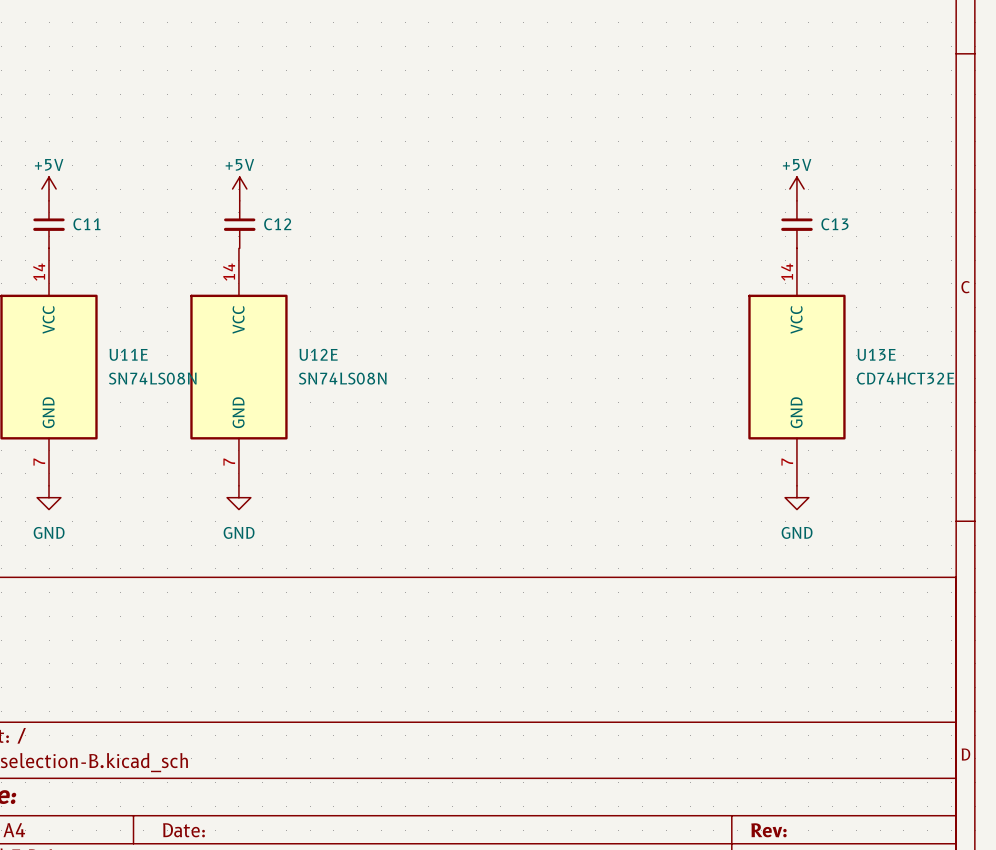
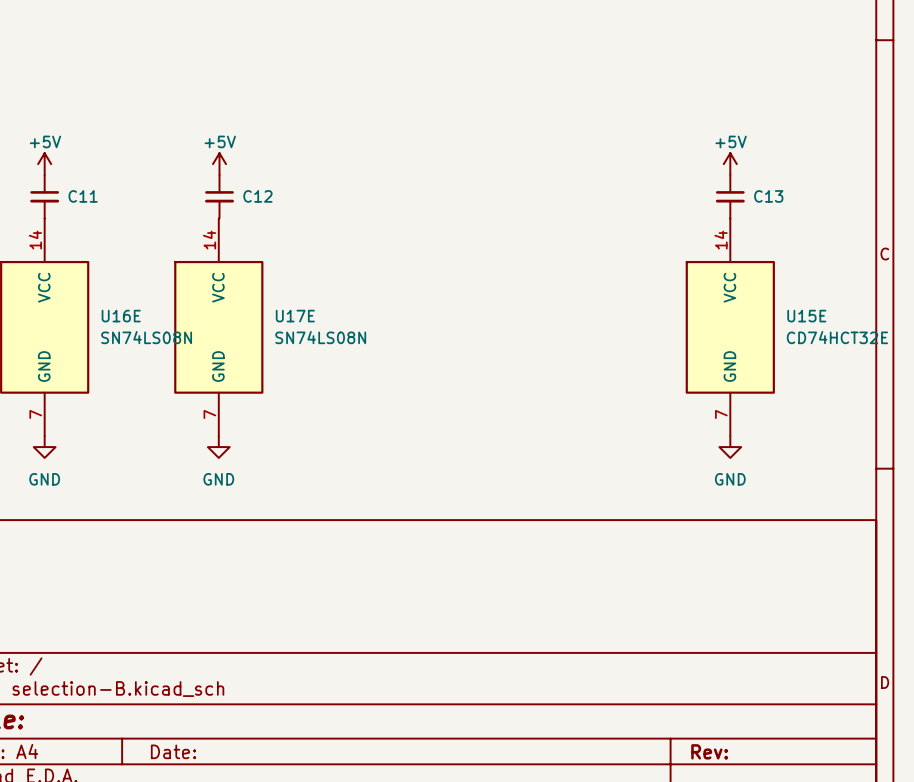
U11E name: U11E (128, 354) -> U16E (121, 316)
U12E name: U12E (318, 354) -> U17E (295, 316)
U13E name: U13E (876, 354) -> U15E (806, 316)

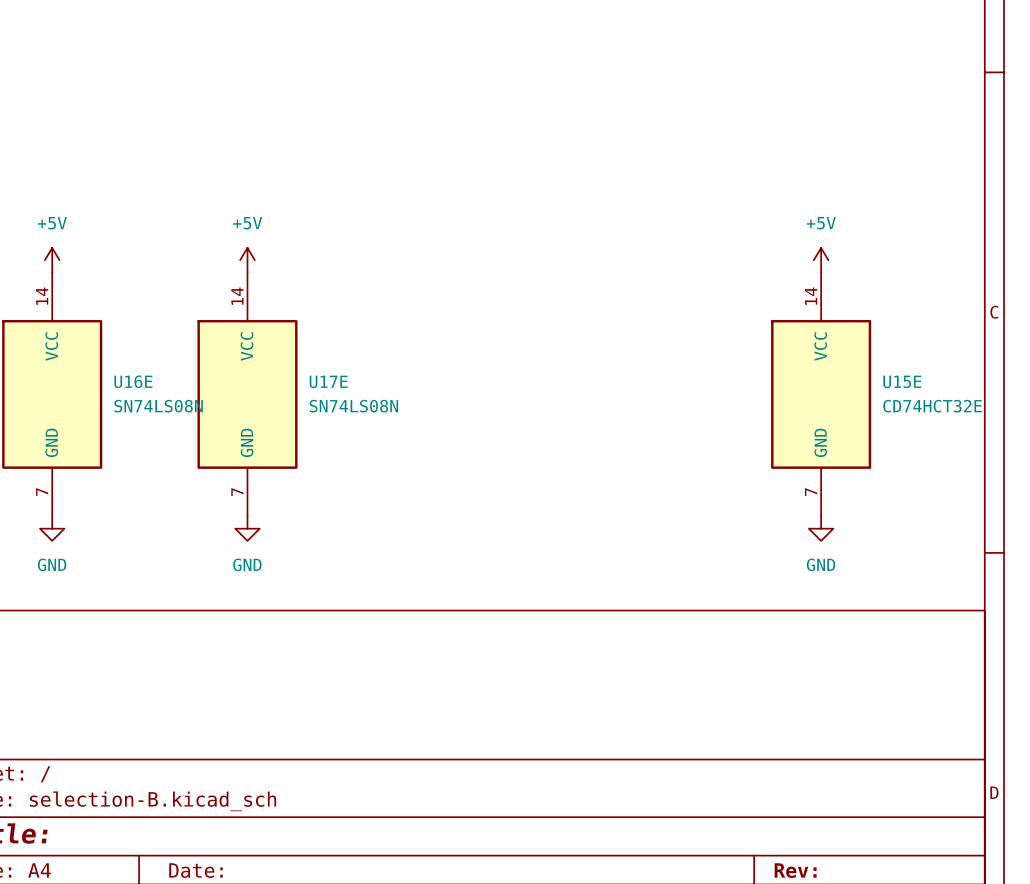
power symbol text position: +5V (45, 141) -> +5V (52, 223)
power symbol text position: +5V (220, 141) -> +5V (247, 223)
power symbol text position: +5V (731, 141) -> +5V (821, 223)
power symbol position: +5V (44, 164) -> +5V (52, 260)
power symbol position: +5V (219, 164) -> +5V (247, 260)
power symbol position: +5V (730, 164) -> +5V (821, 260)
C11: (44, 196) -> none
C12: (219, 196) -> none
C13: (730, 196) -> none

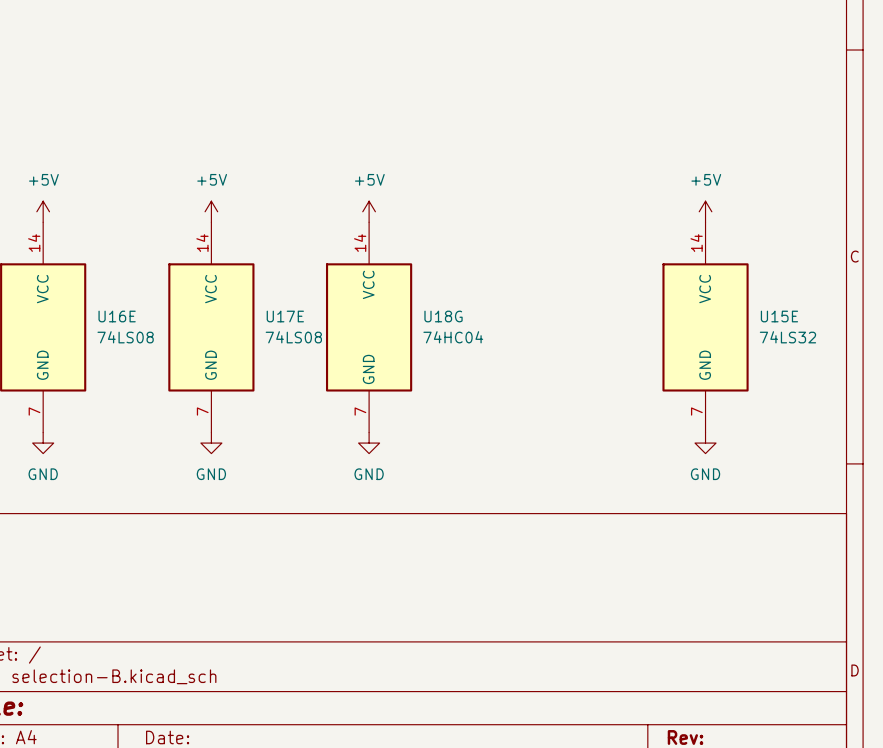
power symbol: none -> +5V (369, 211)
U18G: none -> 74HC04 (369, 327)
U16E value: SN74LS08N (158, 406) -> 74LS08 (125, 337)
U17E value: SN74LS08N (353, 406) -> 74LS08 (293, 337)
U15E value: CD74HCT32E (932, 406) -> 74LS32 (787, 337)
power symbol: none -> GND (369, 443)

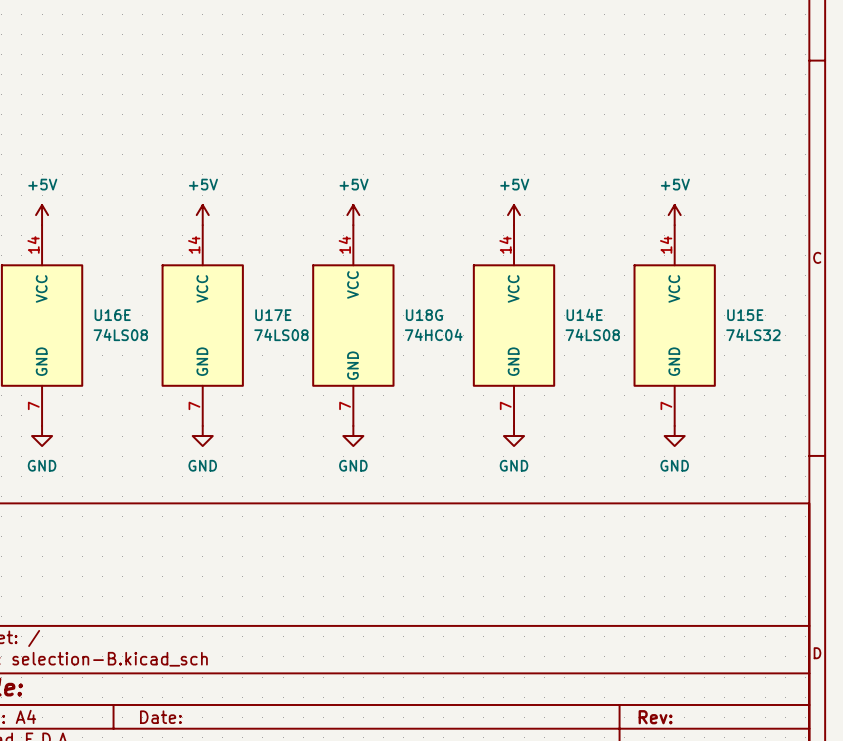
power symbol: none -> +5V (514, 215)
U14E: none -> 74LS08 (514, 325)
power symbol: none -> GND (514, 436)

